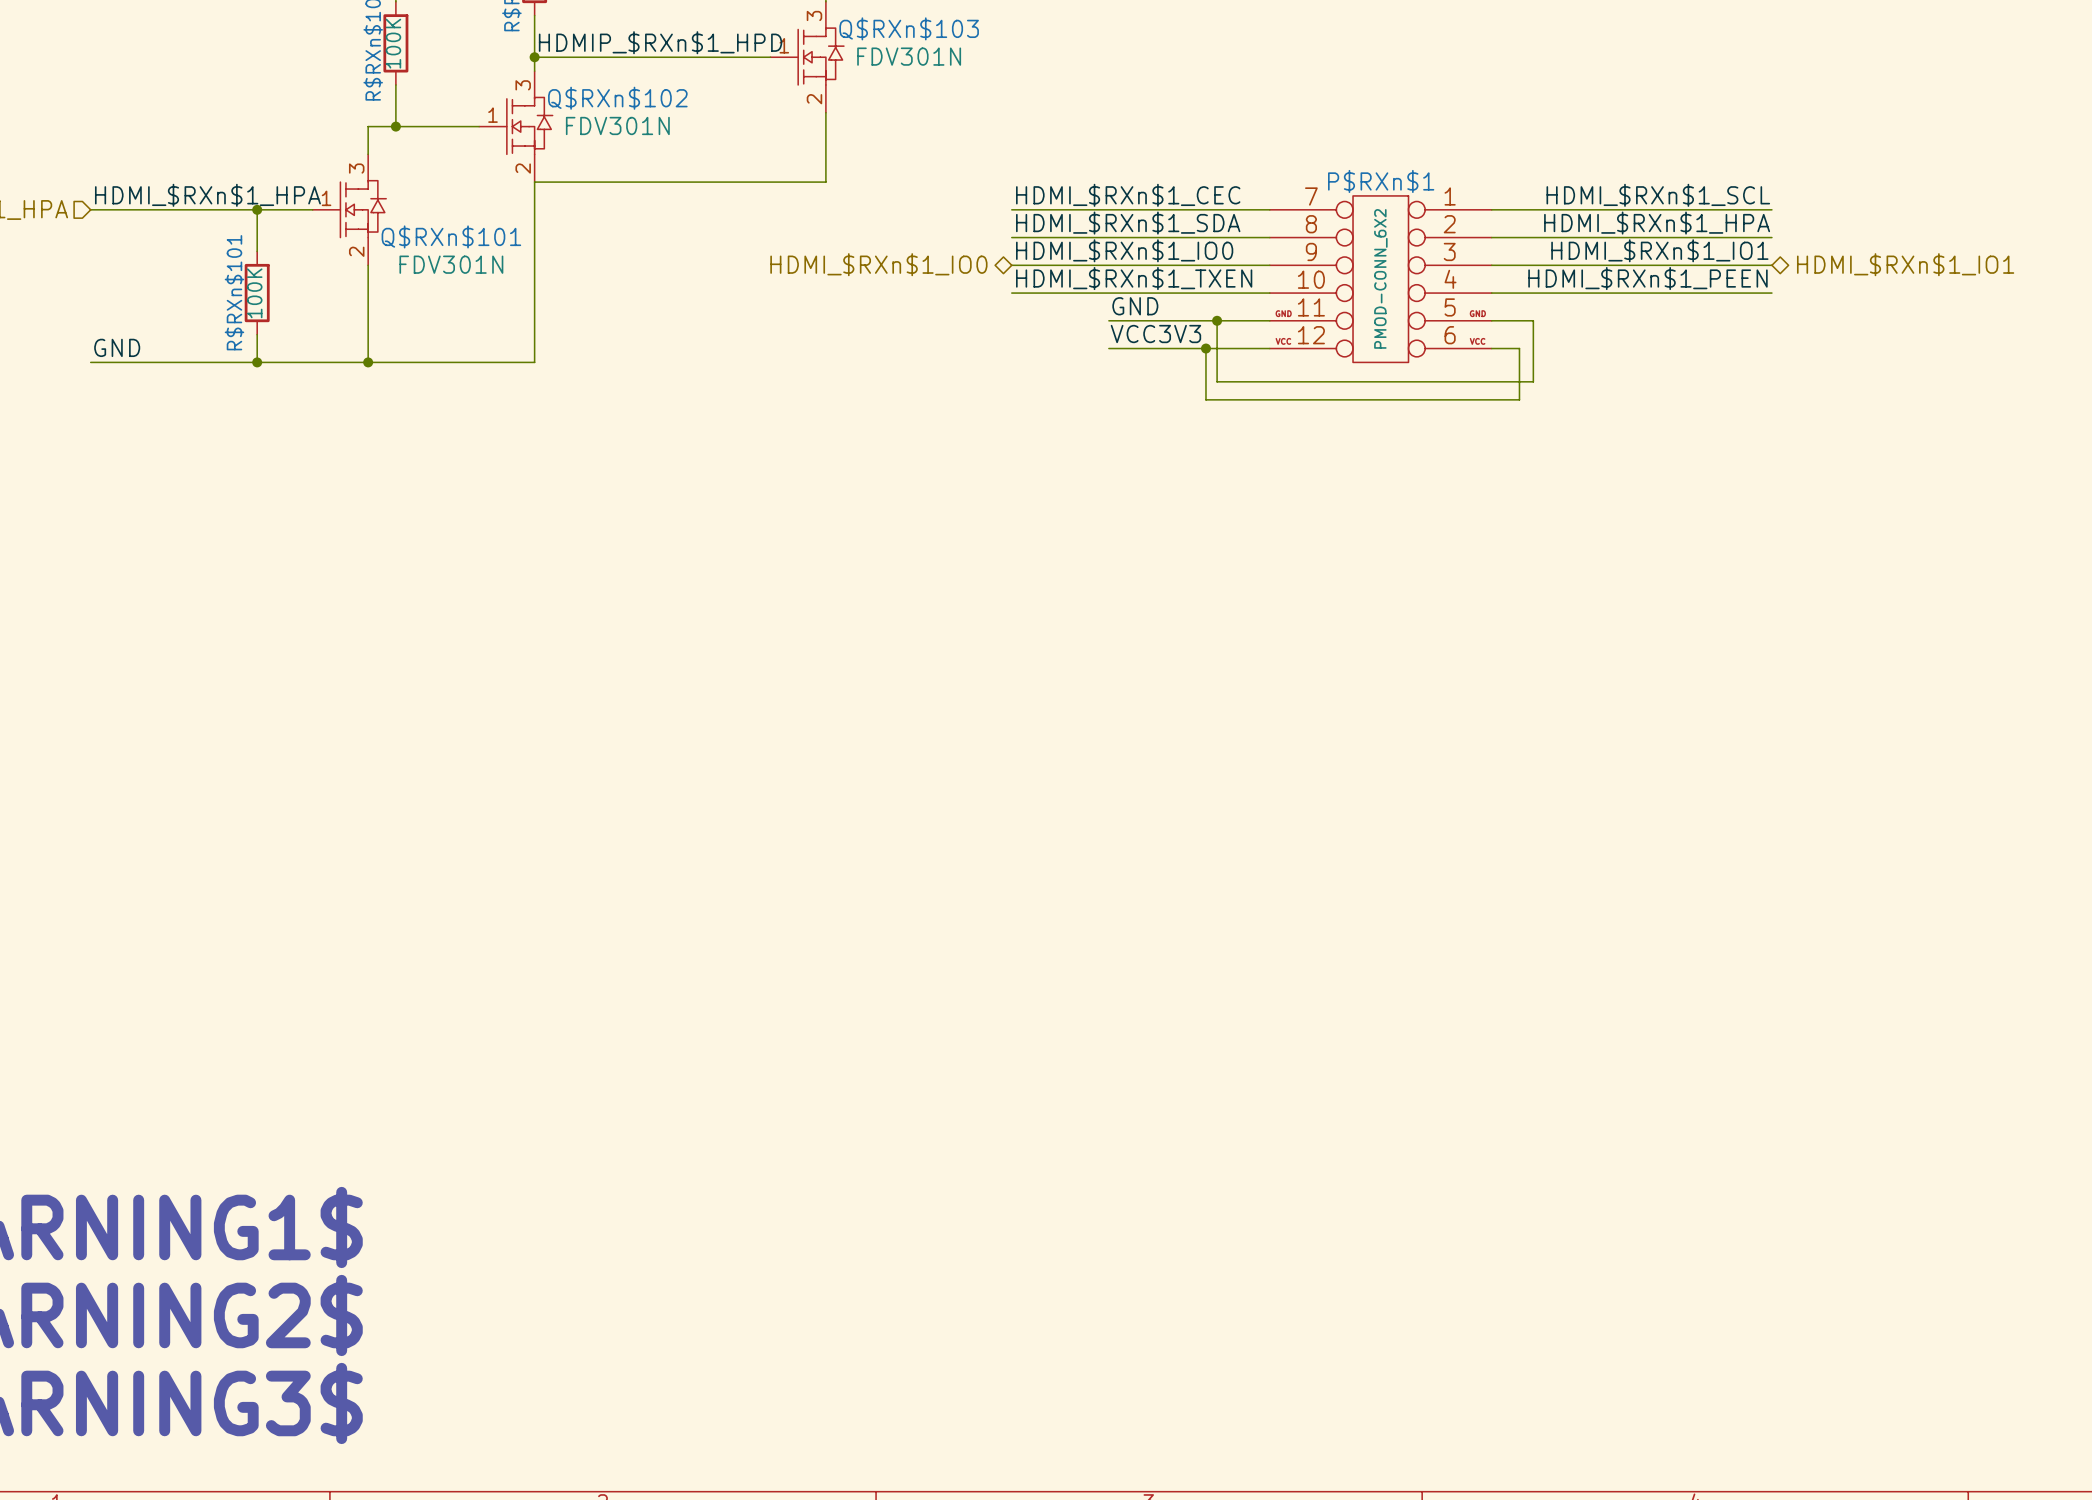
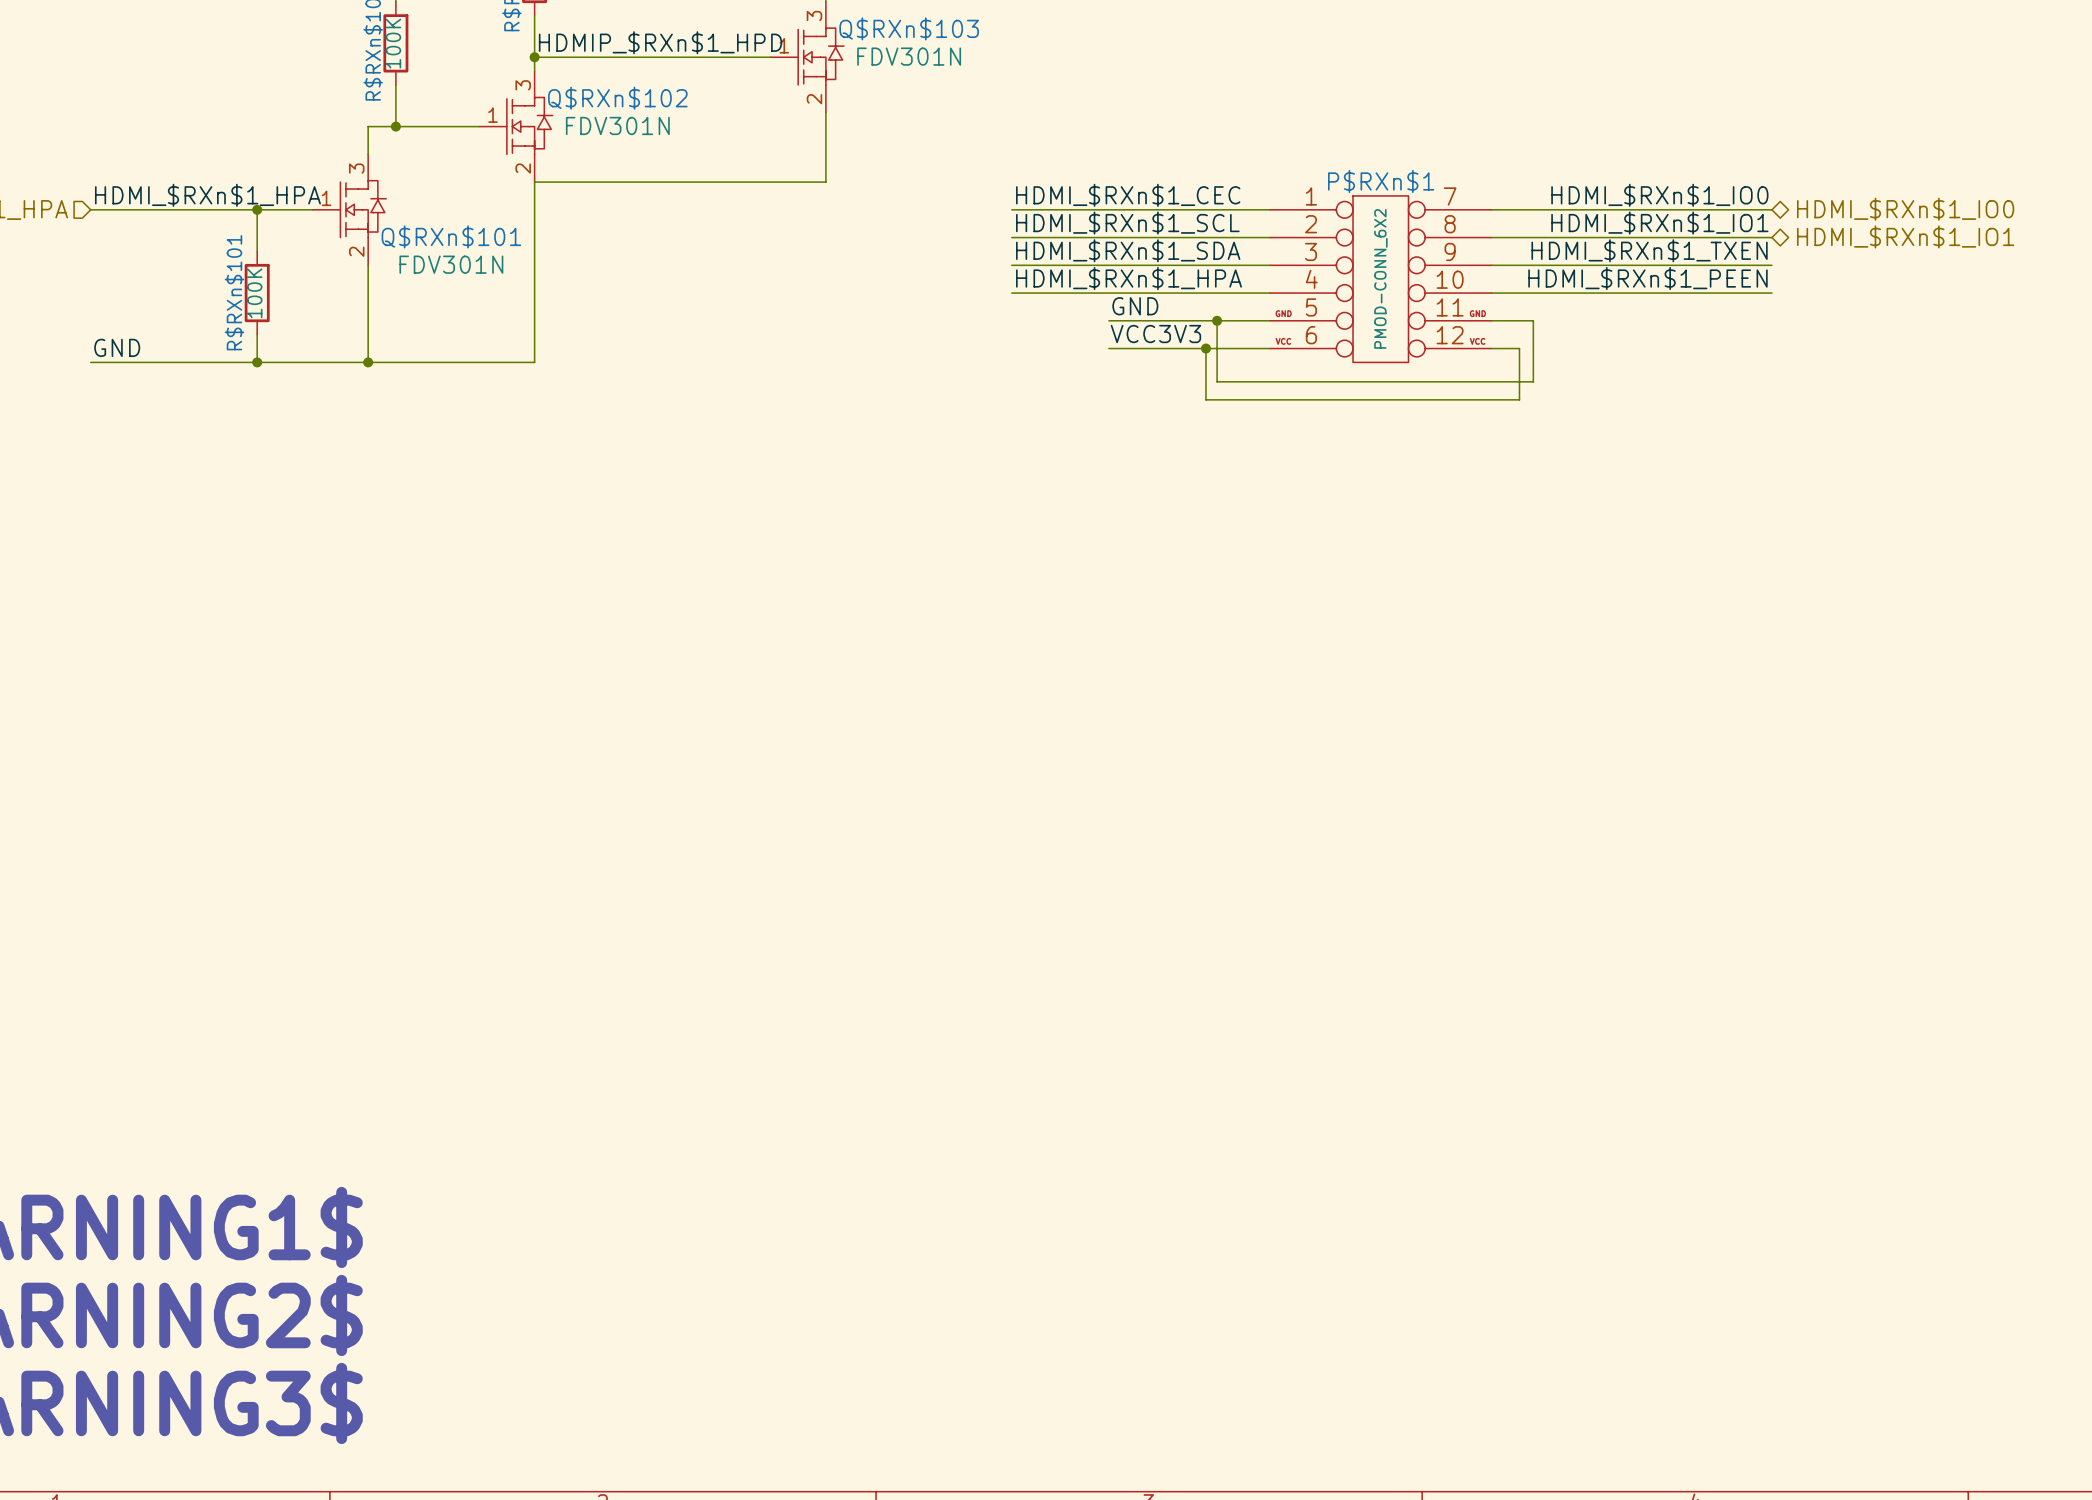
label: HDMI_$RXn$1_SCL (1658, 195) -> HDMI_$RXn$1_IO0 (1659, 195)
hierarchical label: none -> HDMI_$RXn$1_IO0 (1905, 209)
label: HDMI_$RXn$1_SDA (1128, 223) -> HDMI_$RXn$1_SCL (1127, 223)
label: HDMI_$RXn$1_HPA (1657, 223) -> HDMI_$RXn$1_IO1 (1659, 223)
label: HDMI_$RXn$1_IO0 (1124, 250) -> HDMI_$RXn$1_SDA (1128, 250)
label: HDMI_$RXn$1_IO1 (1659, 250) -> HDMI_$RXn$1_TXEN (1649, 250)
hierarchical label: HDMI_$RXn$1_IO0 (878, 264) -> none
hierarchical label position: HDMI_$RXn$1_IO1 (1905, 264) -> HDMI_$RXn$1_IO1 (1905, 236)
label: HDMI_$RXn$1_TXEN (1134, 278) -> HDMI_$RXn$1_HPA (1129, 278)
P$RXn$1 flip: as is (1380, 279) -> left-right (1380, 279)

